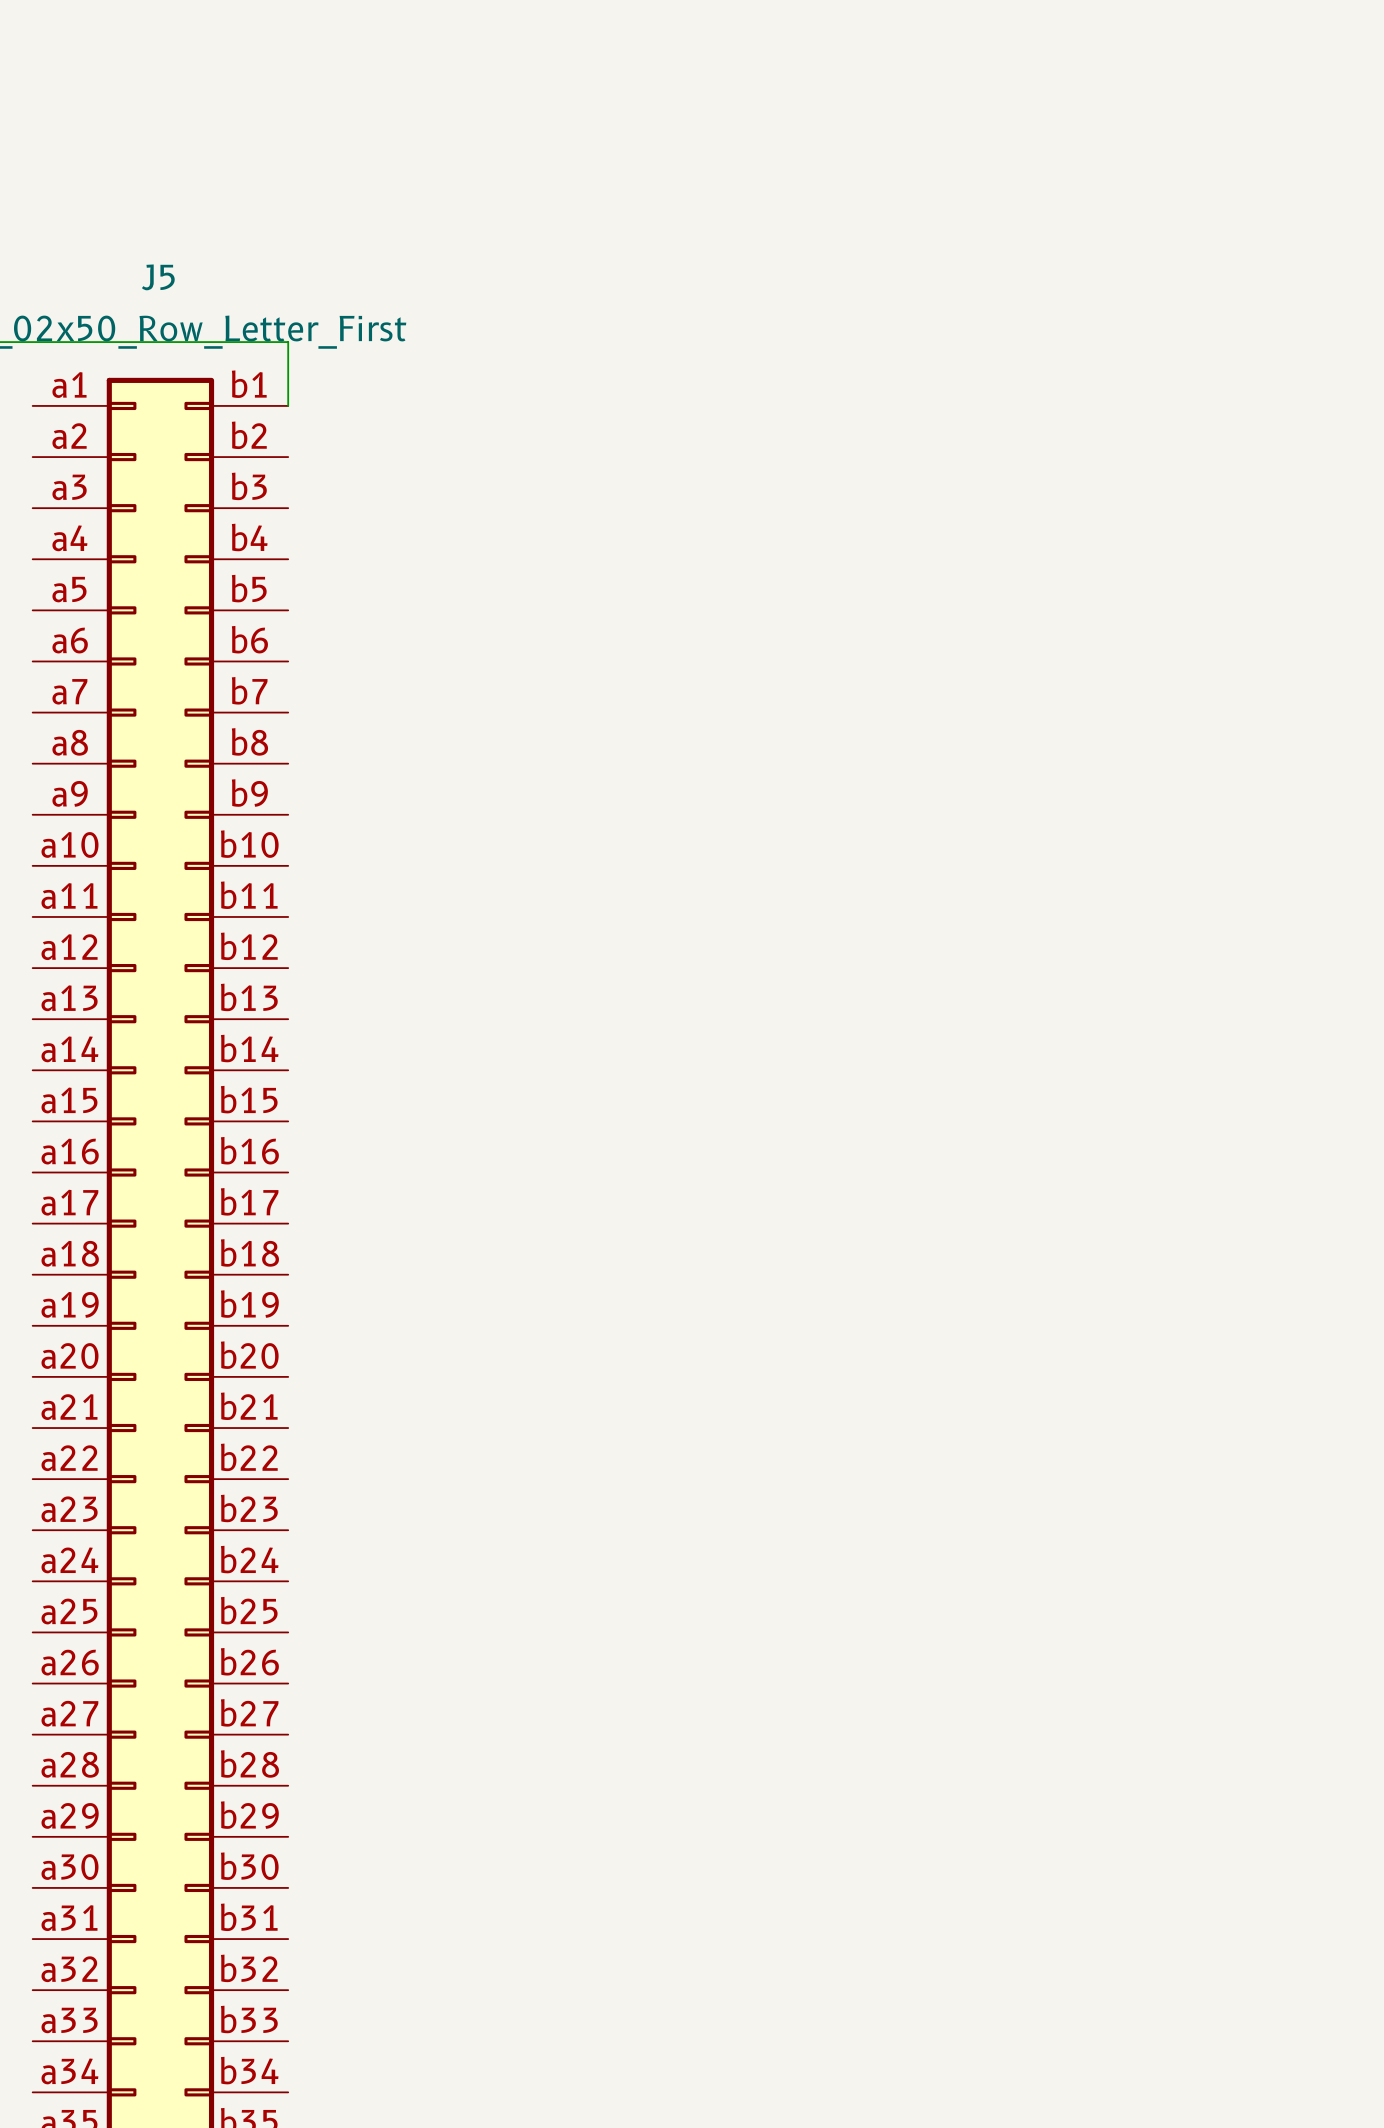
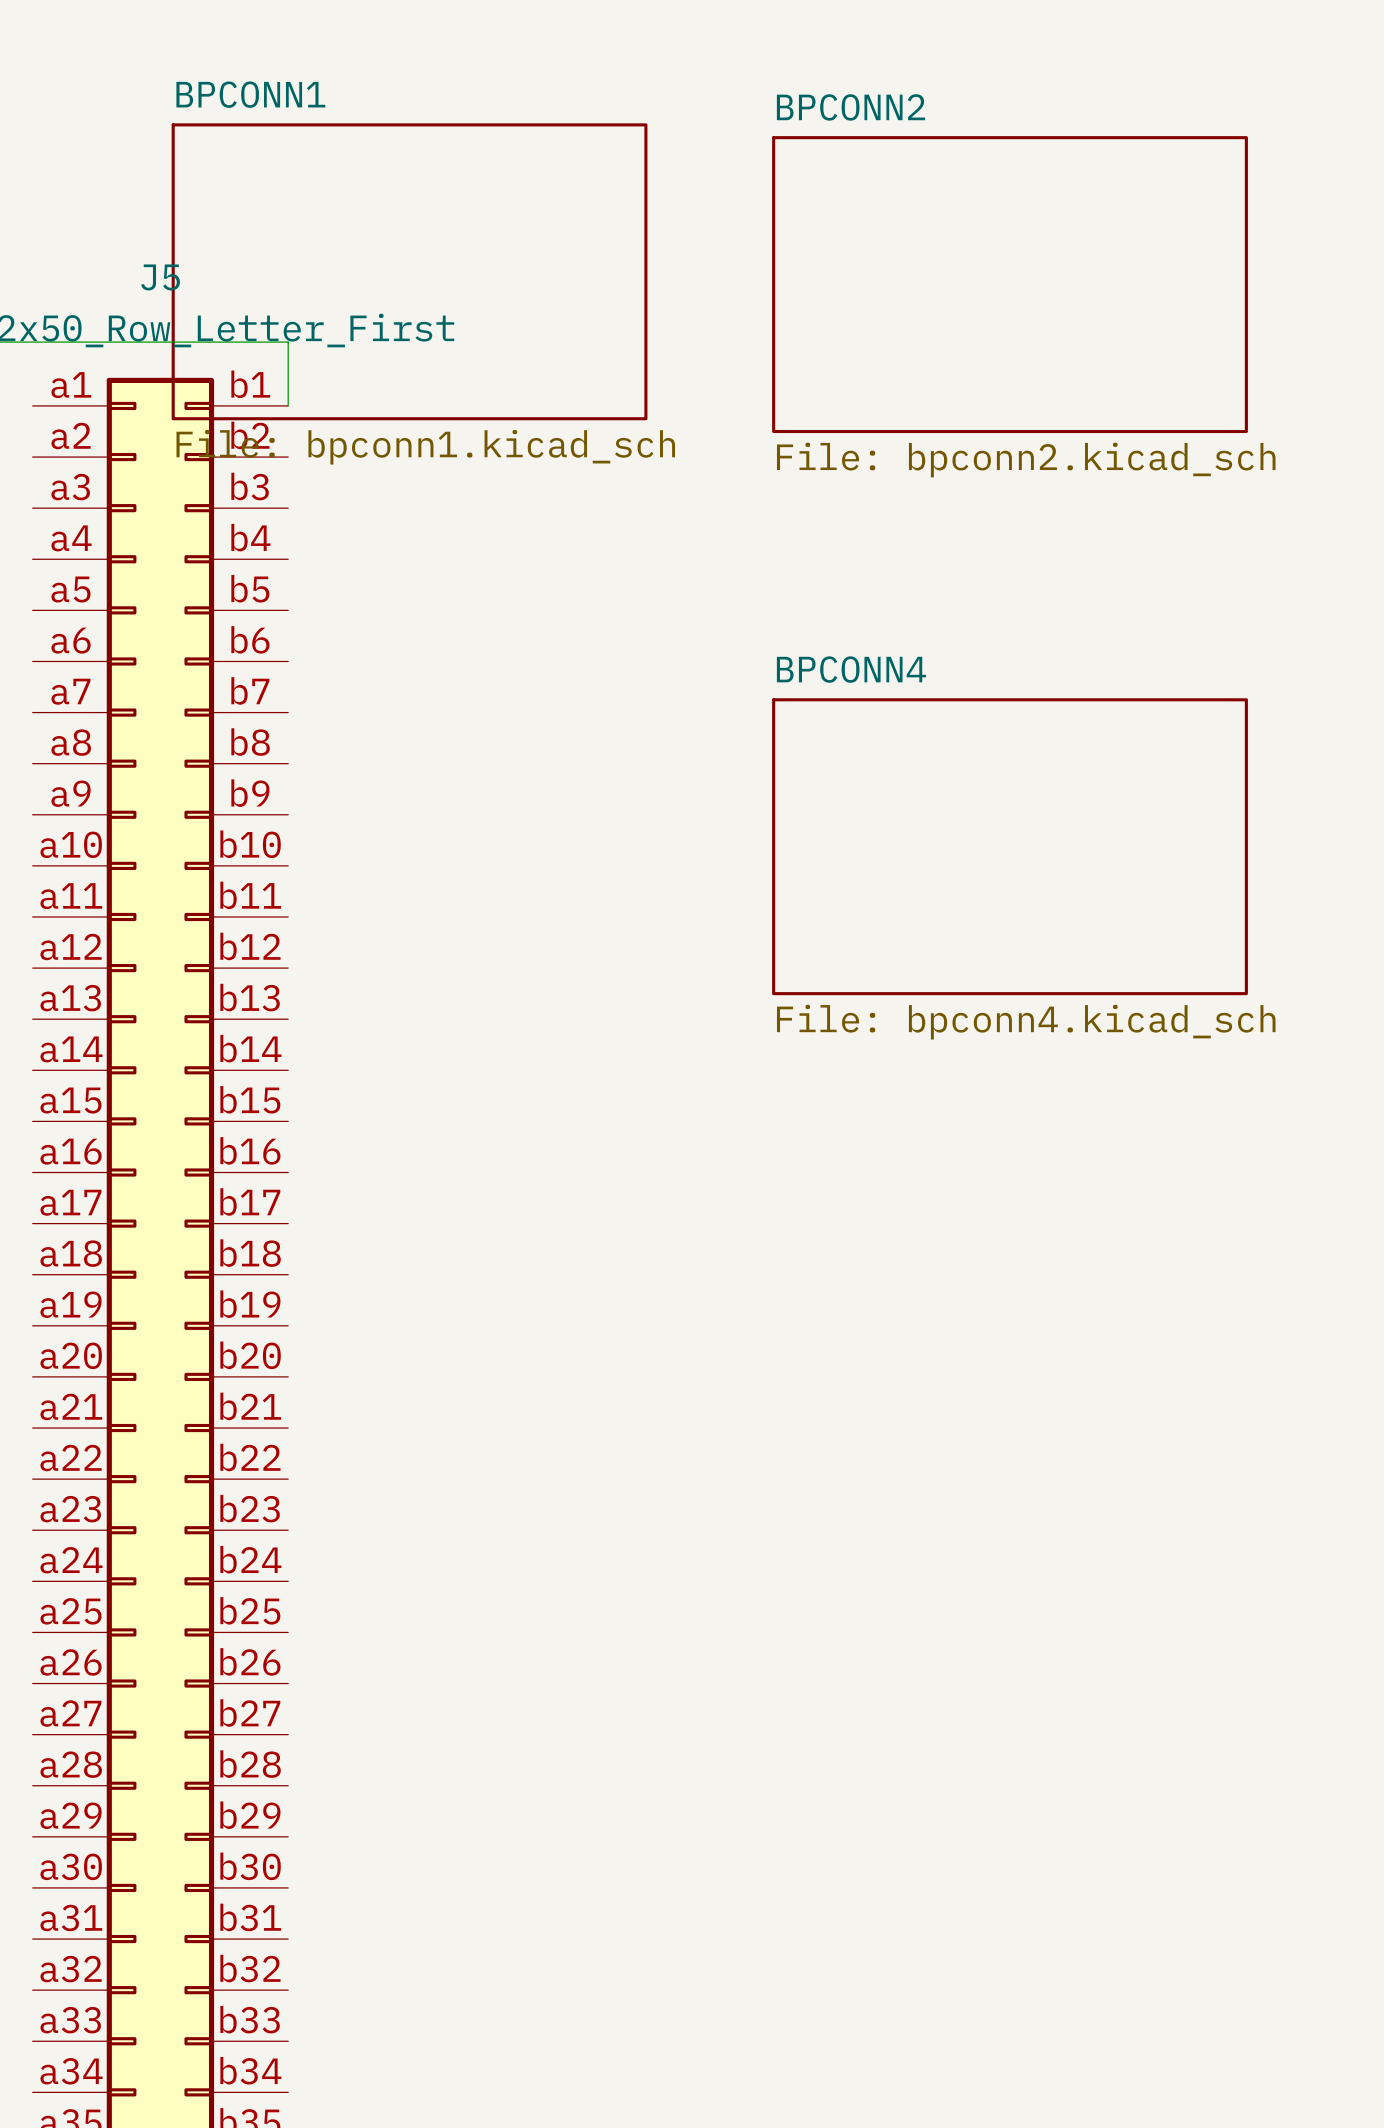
sheet BPCONN1: none -> File: bpconn1.kicad_sch (409, 271)
sheet BPCONN2: none -> File: bpconn2.kicad_sch (1010, 284)
sheet BPCONN4: none -> File: bpconn4.kicad_sch (1010, 846)

